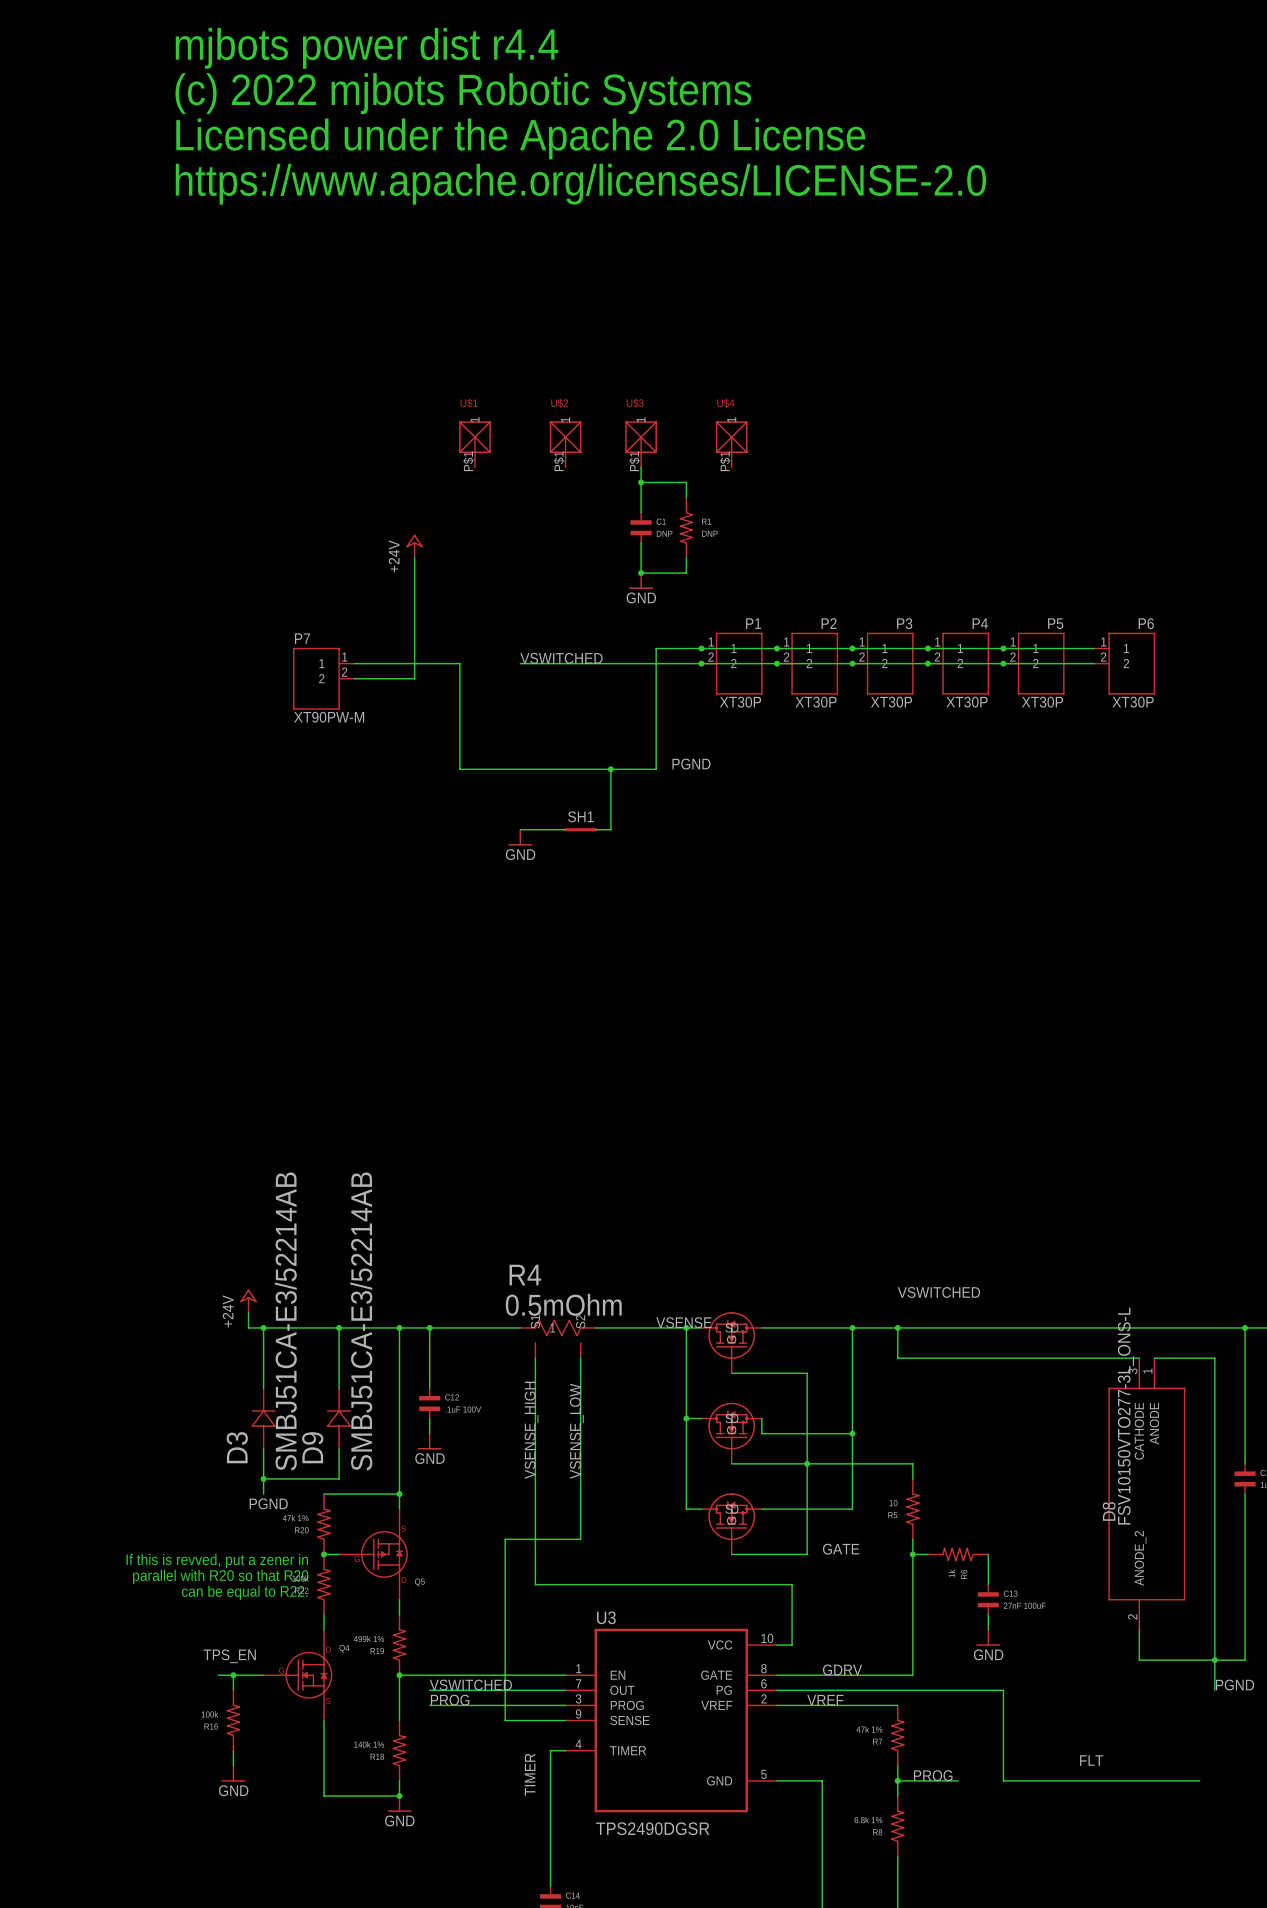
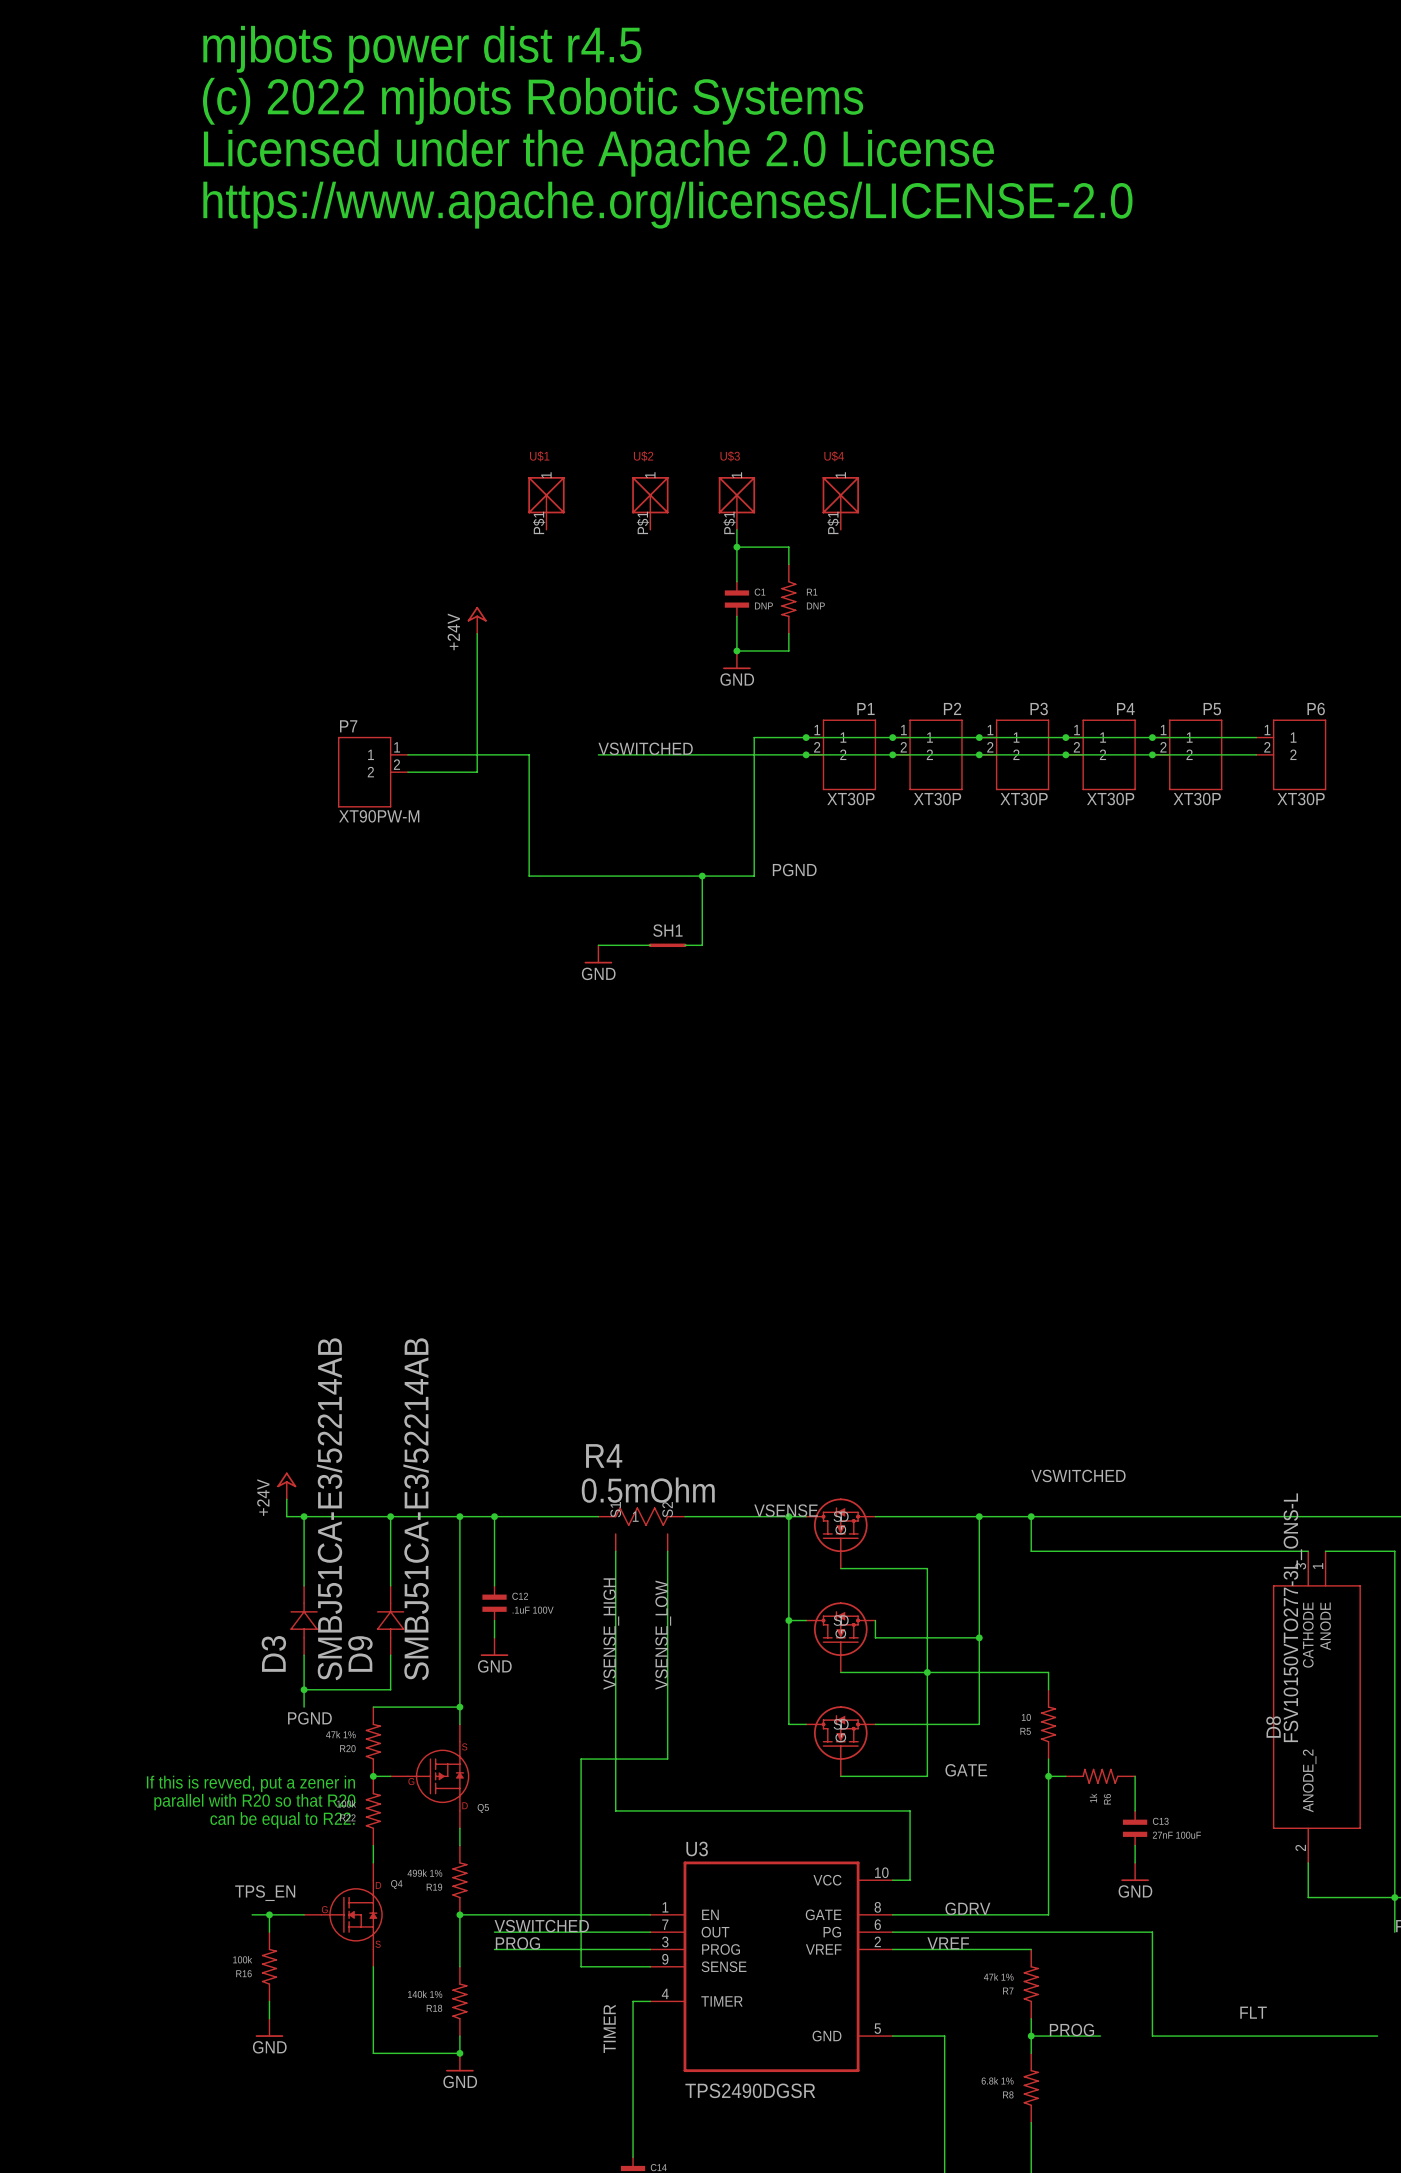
text: mjbots power dist r4.4 (366, 48) -> mjbots power dist r4.5 (422, 49)

